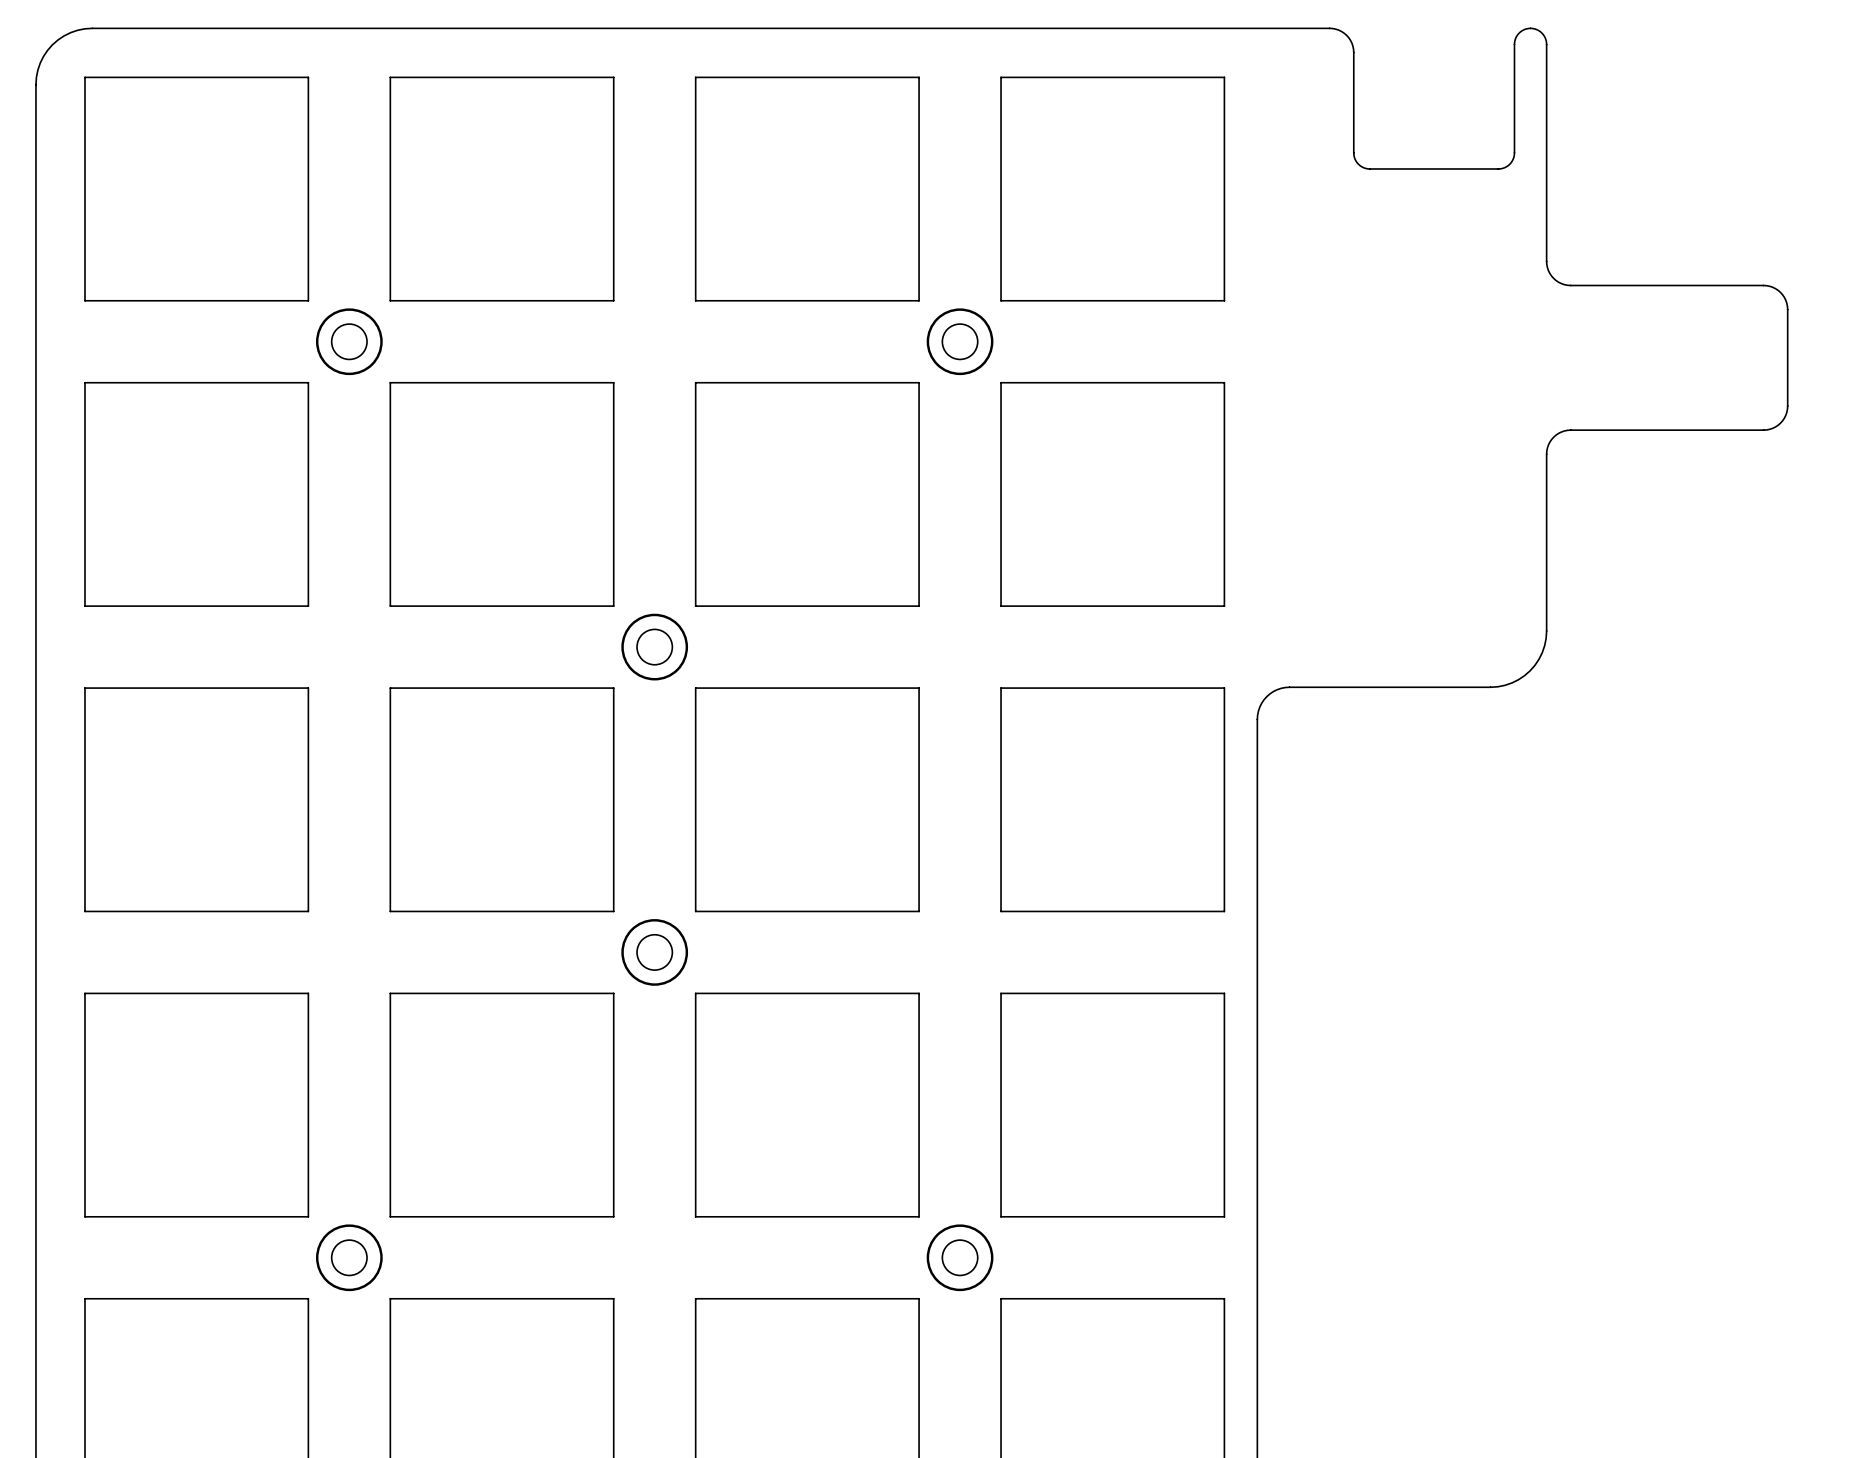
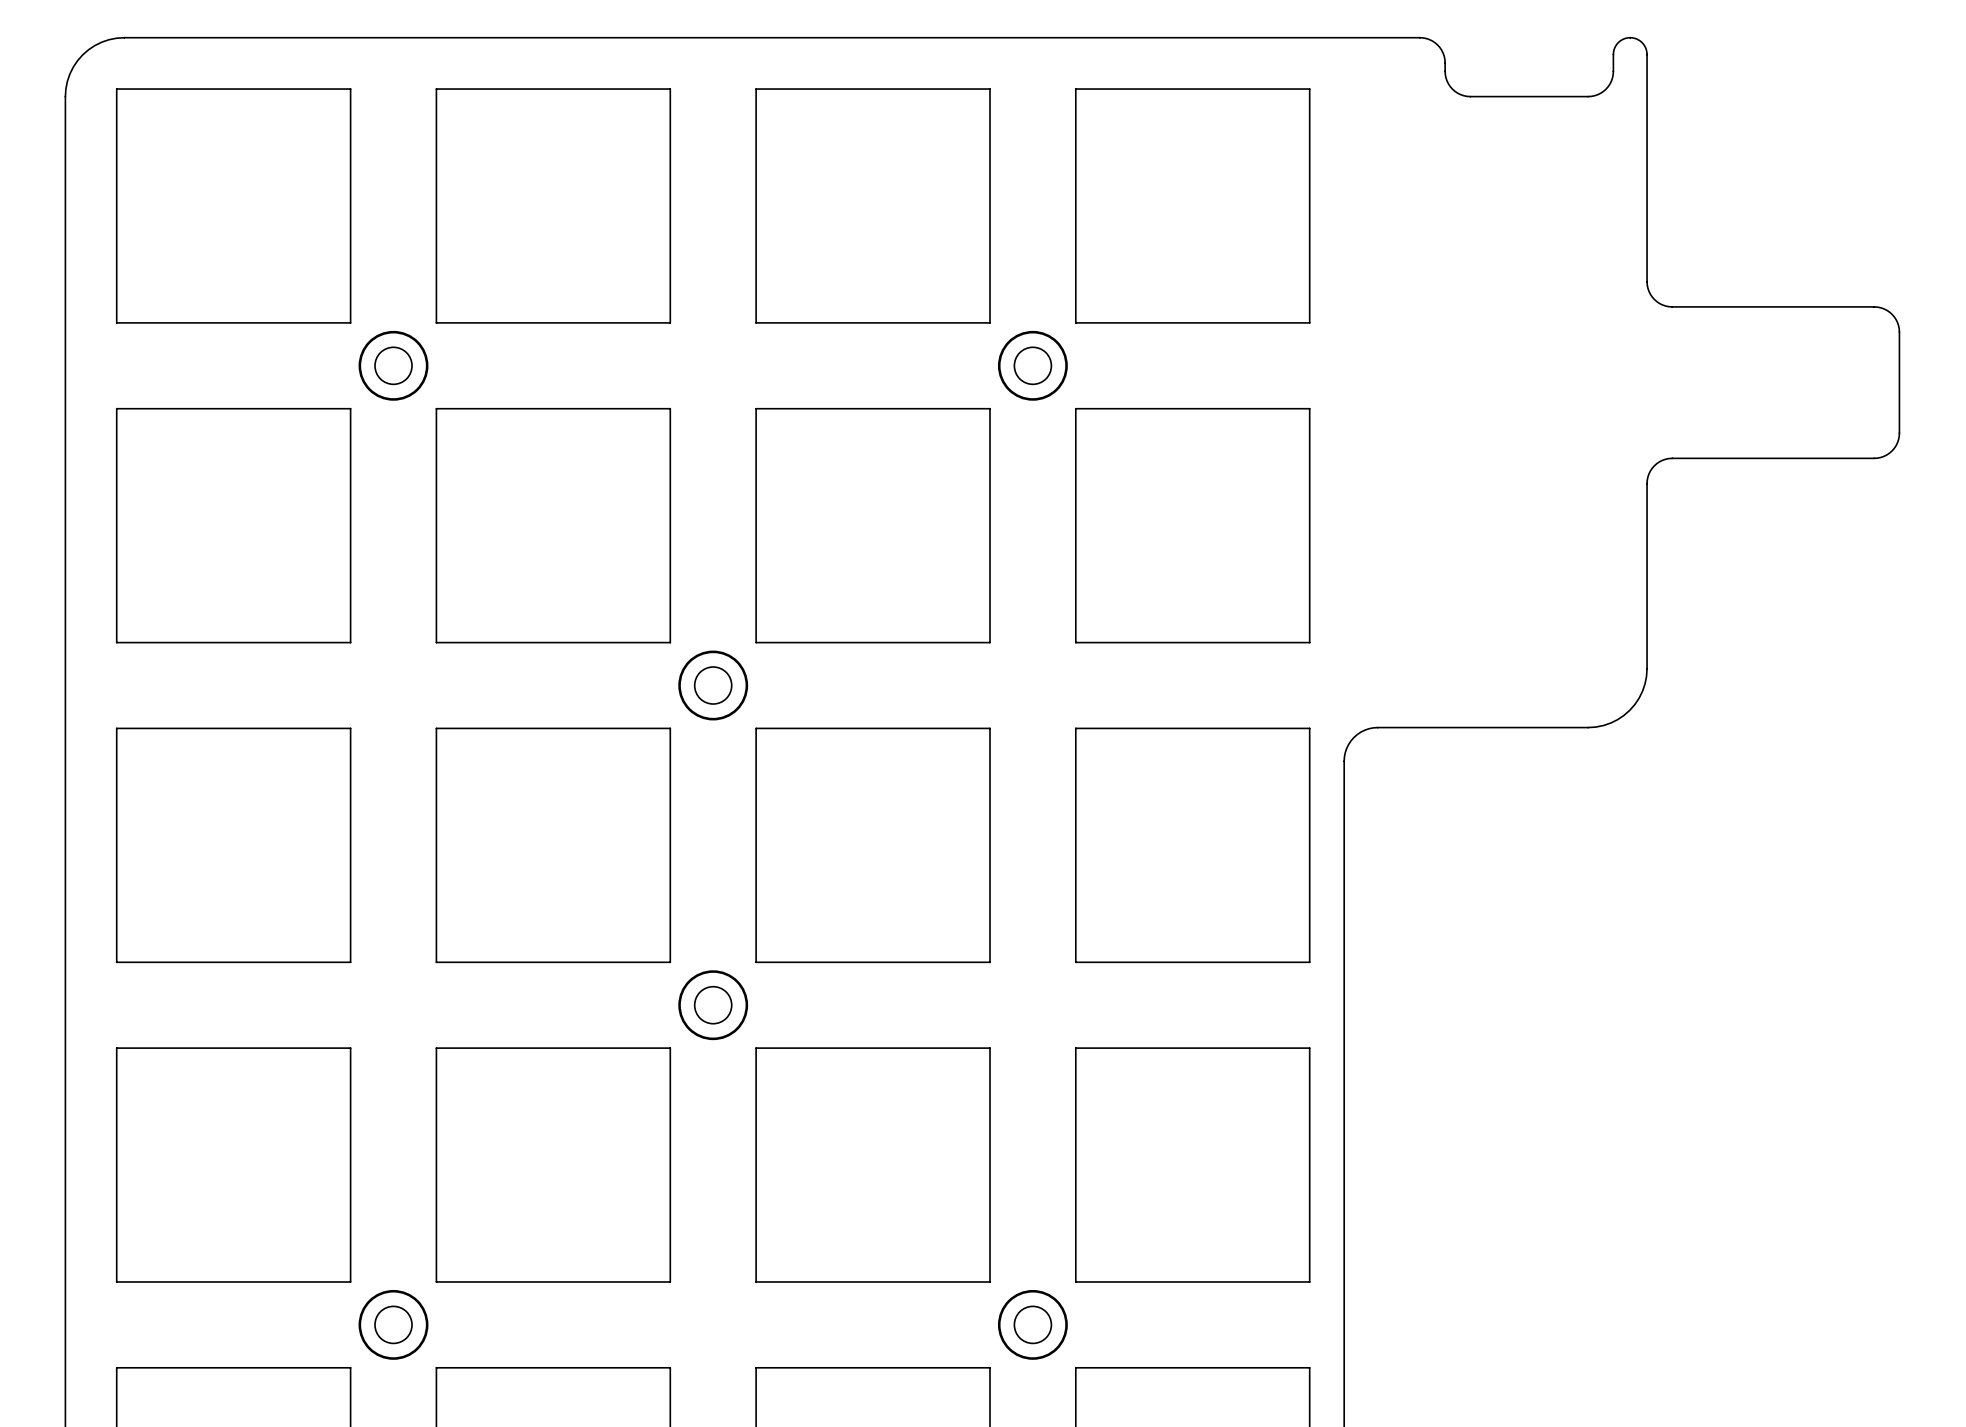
board edge: (1353, 60) (1353, 155) (1360, 165) (1369, 168) (1498, 168) (1508, 165) (1513, 159) (1514, 152) (1514, 60) -> (1445, 71) (1447, 81) (1452, 89) (1460, 94) (1470, 96) (1591, 96) (1606, 89) (1611, 81) (1613, 71)

